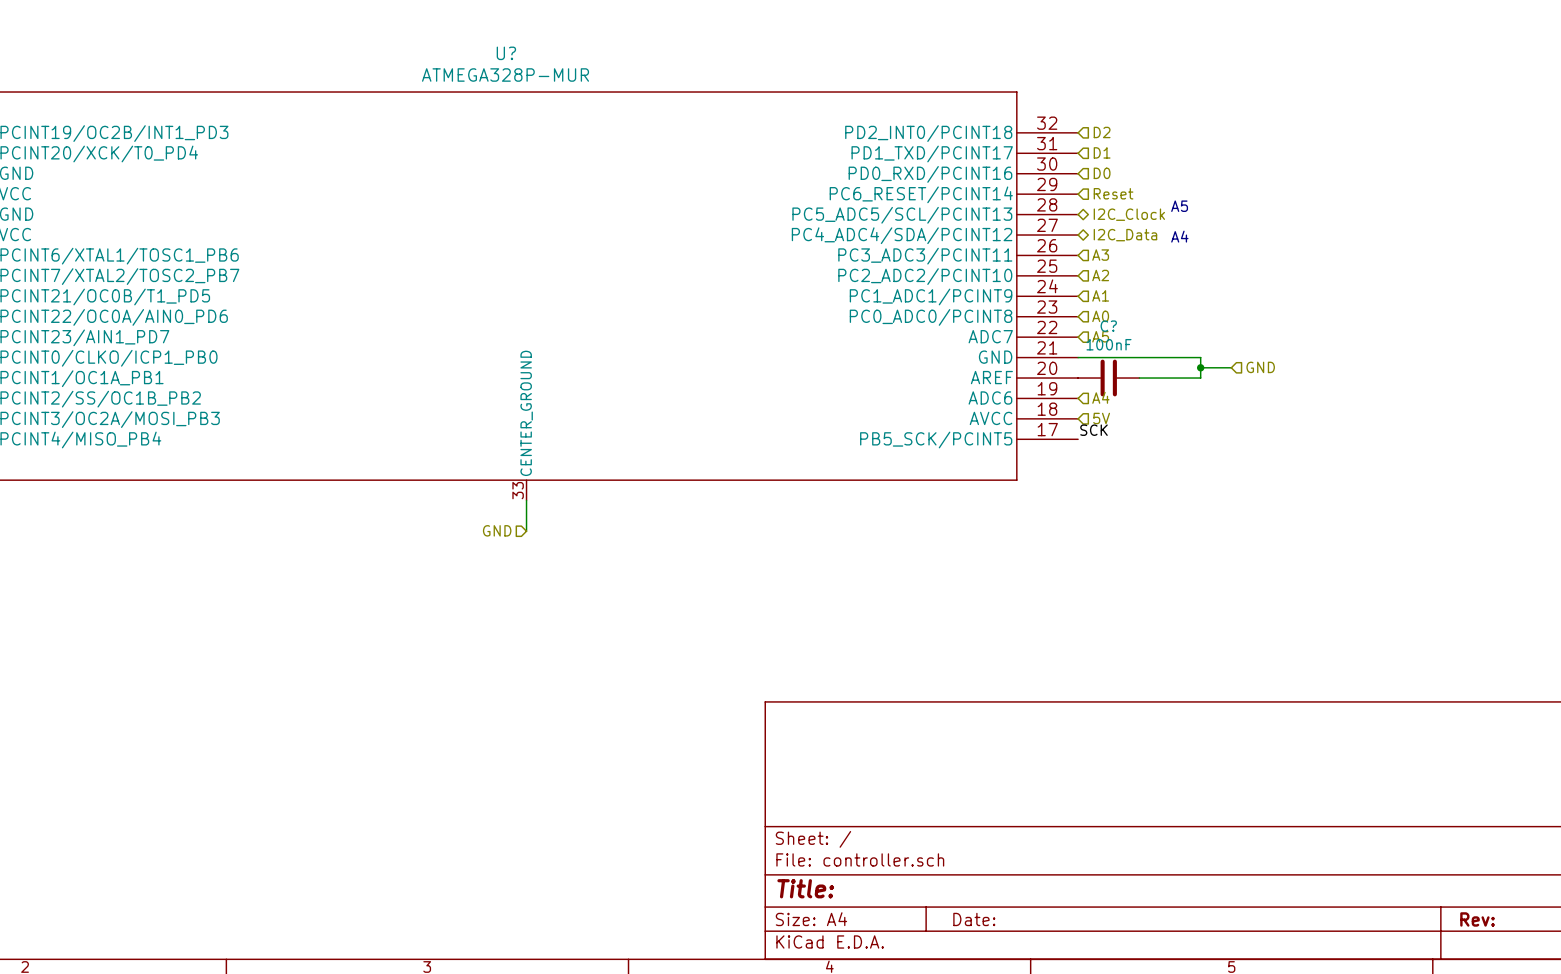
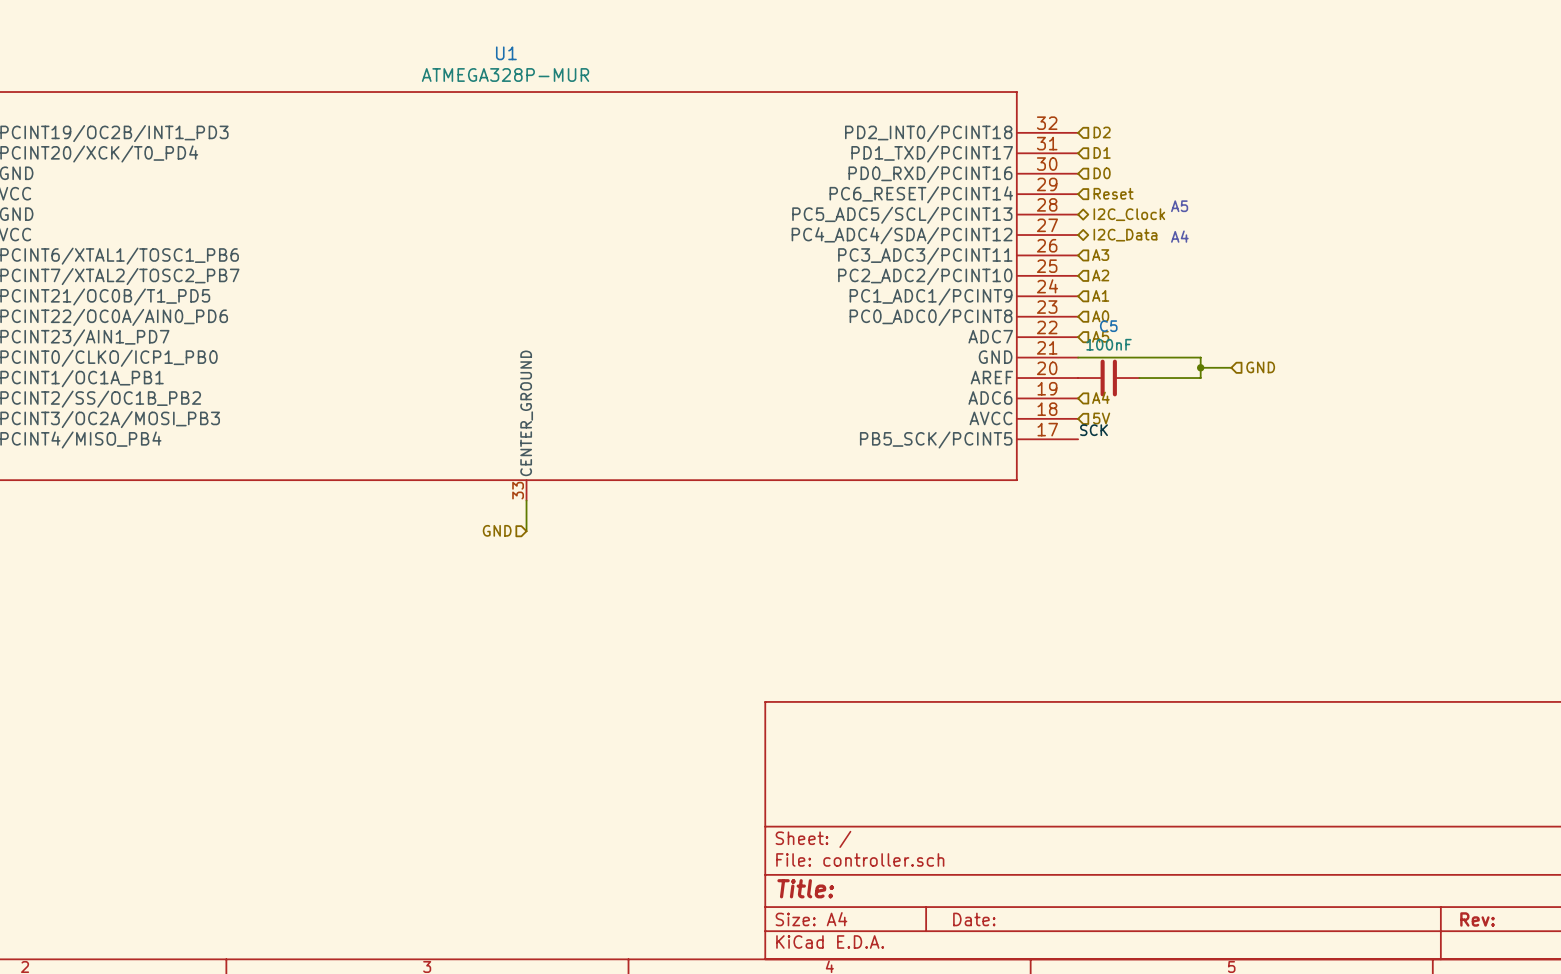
U? name: U? (506, 53) -> U1 (506, 53)
C? name: C? (1108, 326) -> C5 (1108, 326)

